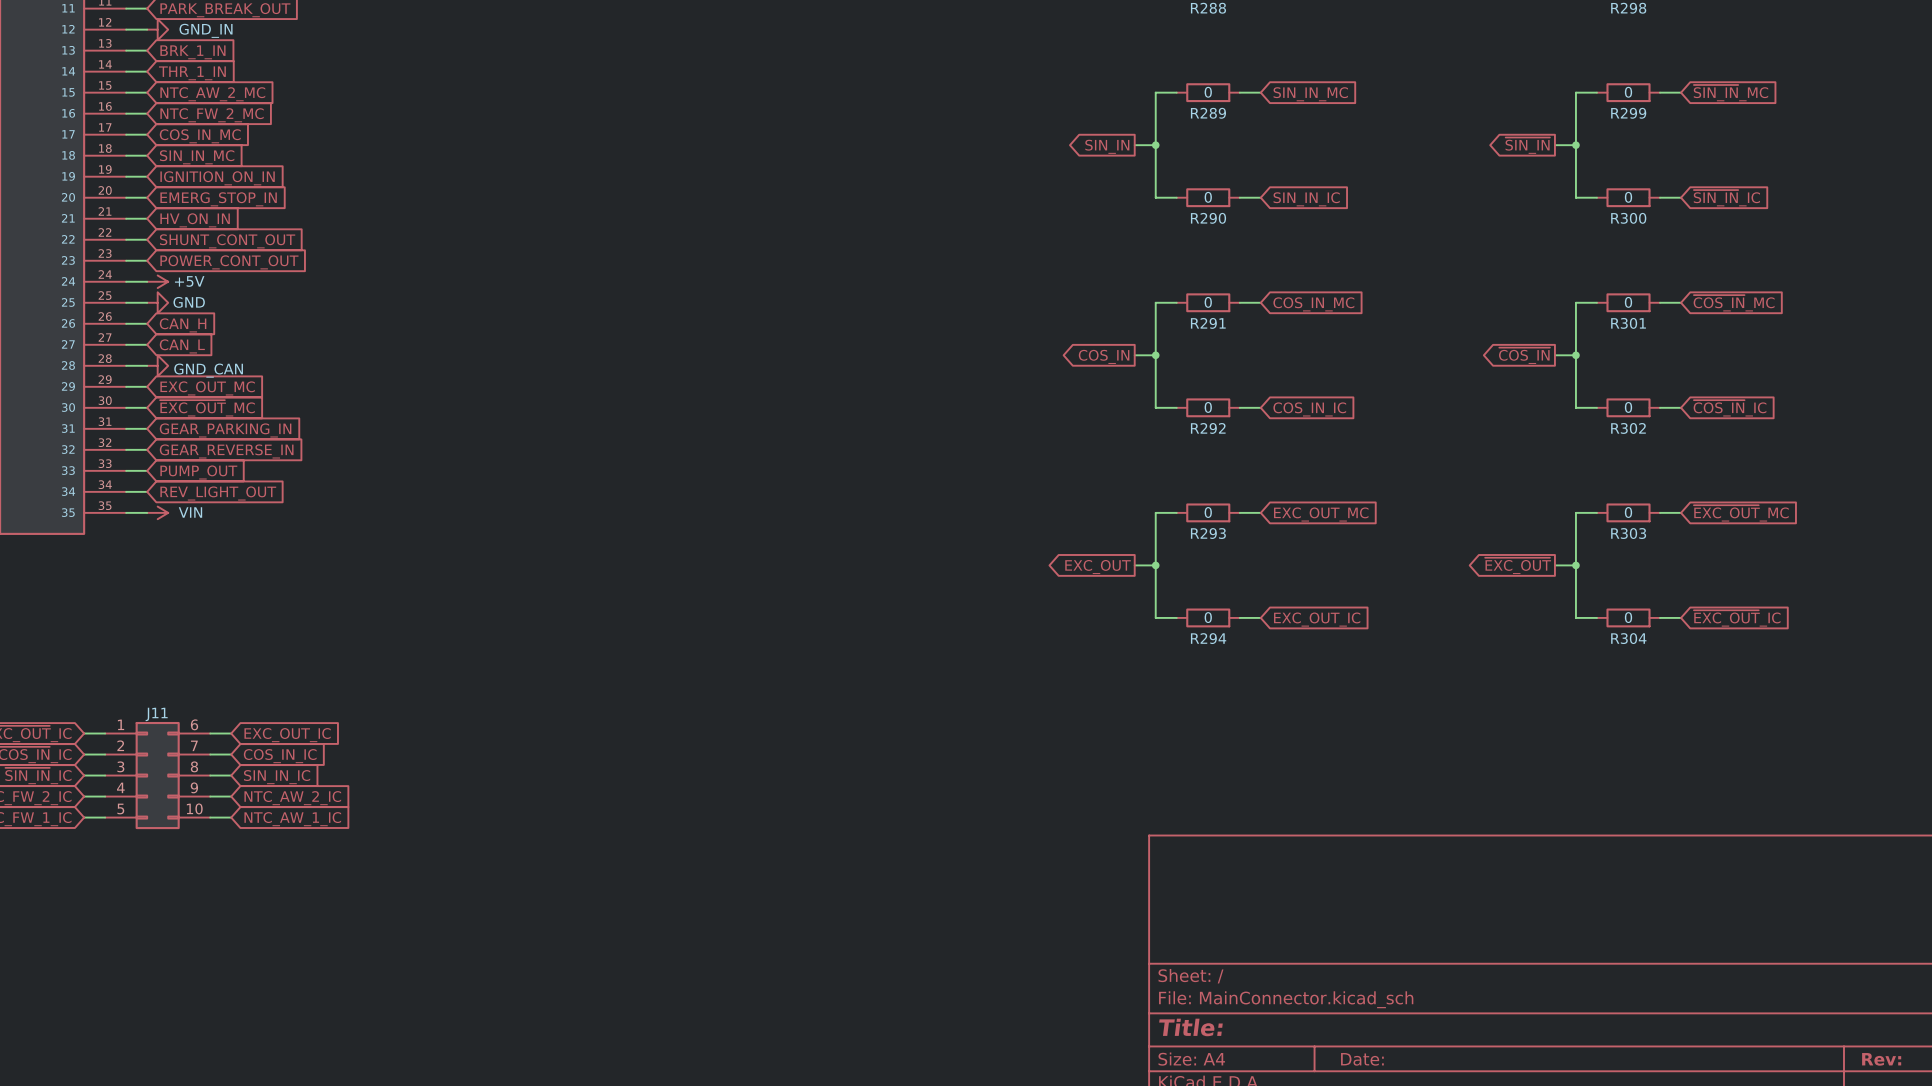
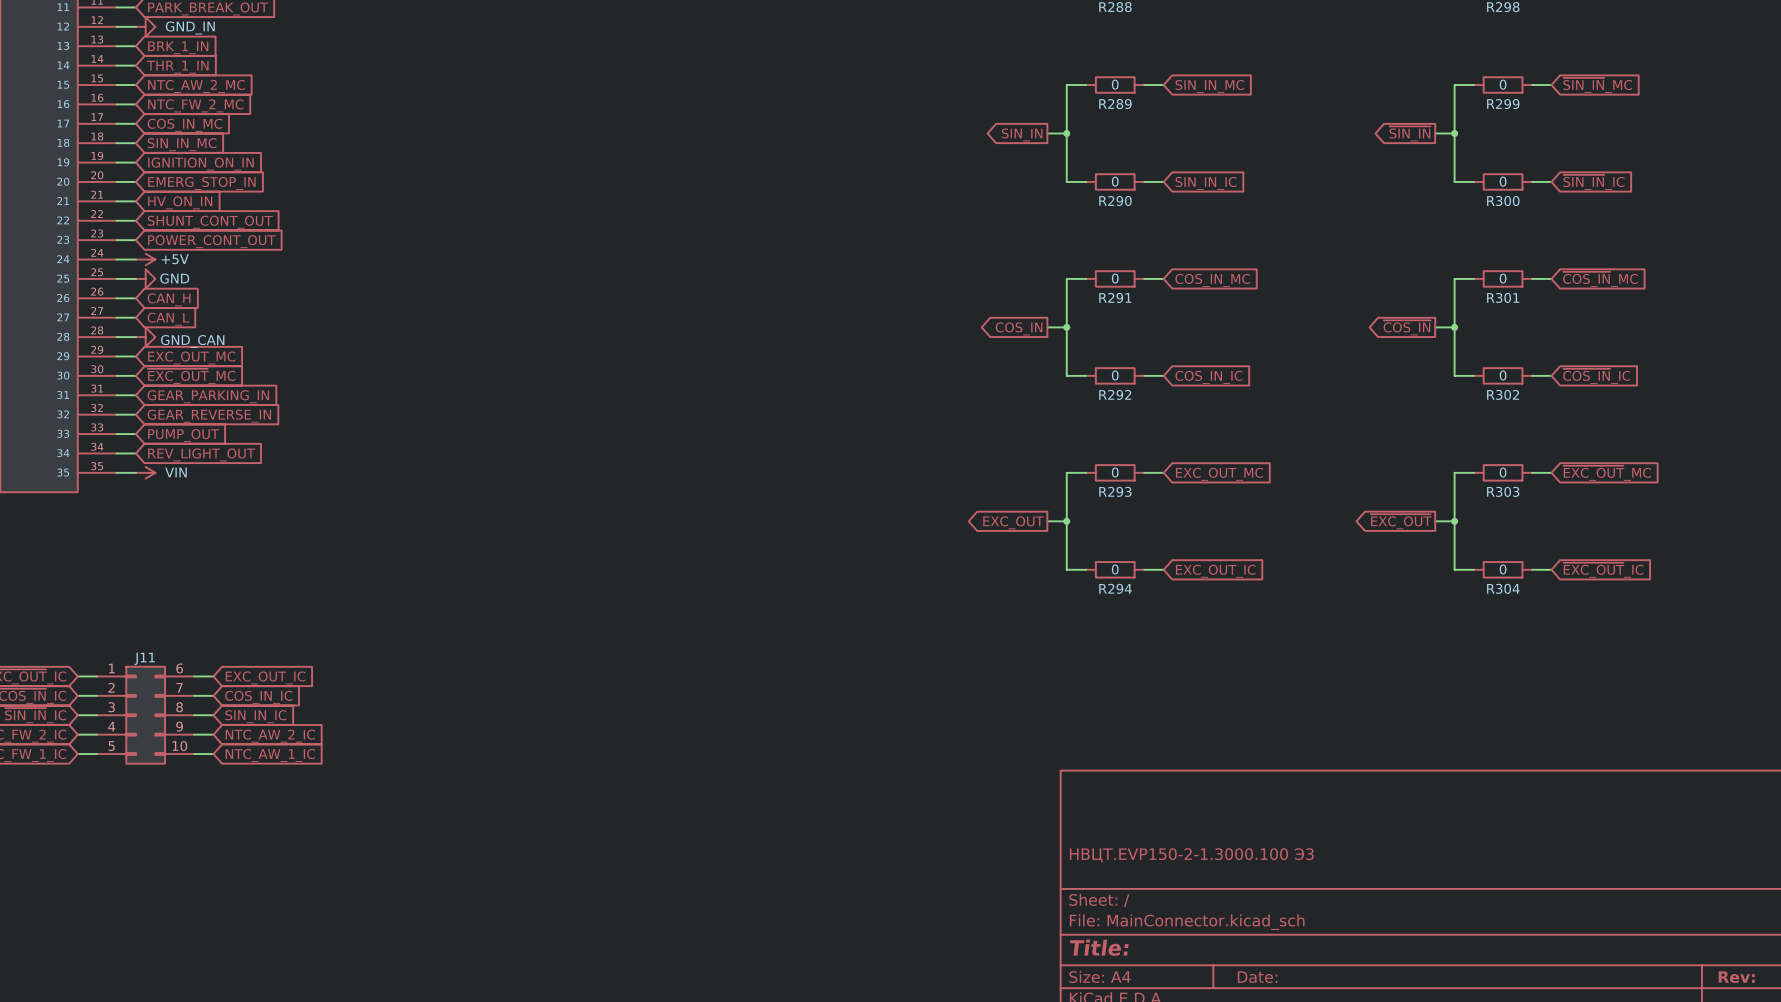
title block: none -> НВЦТ.EVP150-2-1.3000.100 Э3 (1191, 855)

